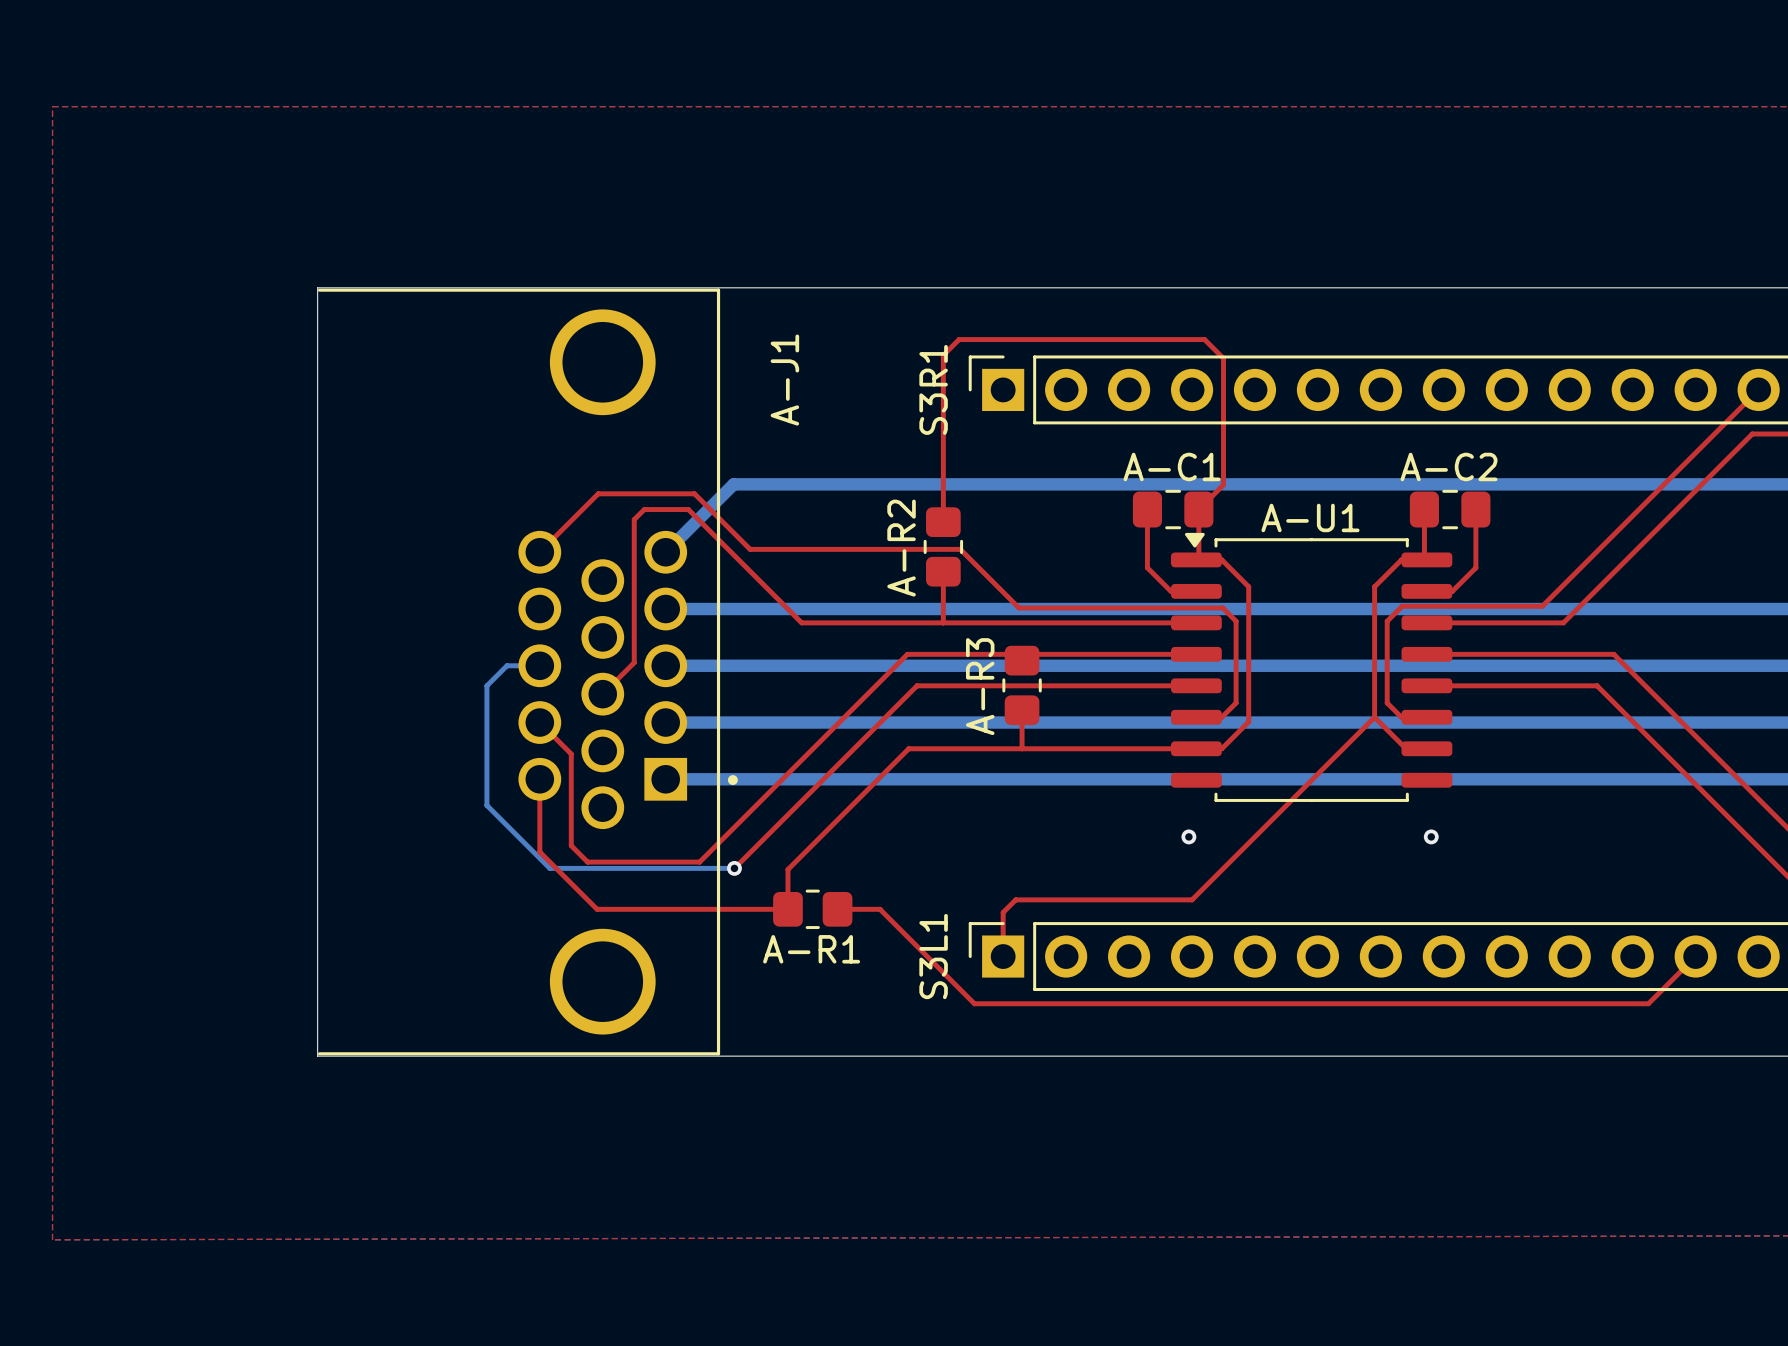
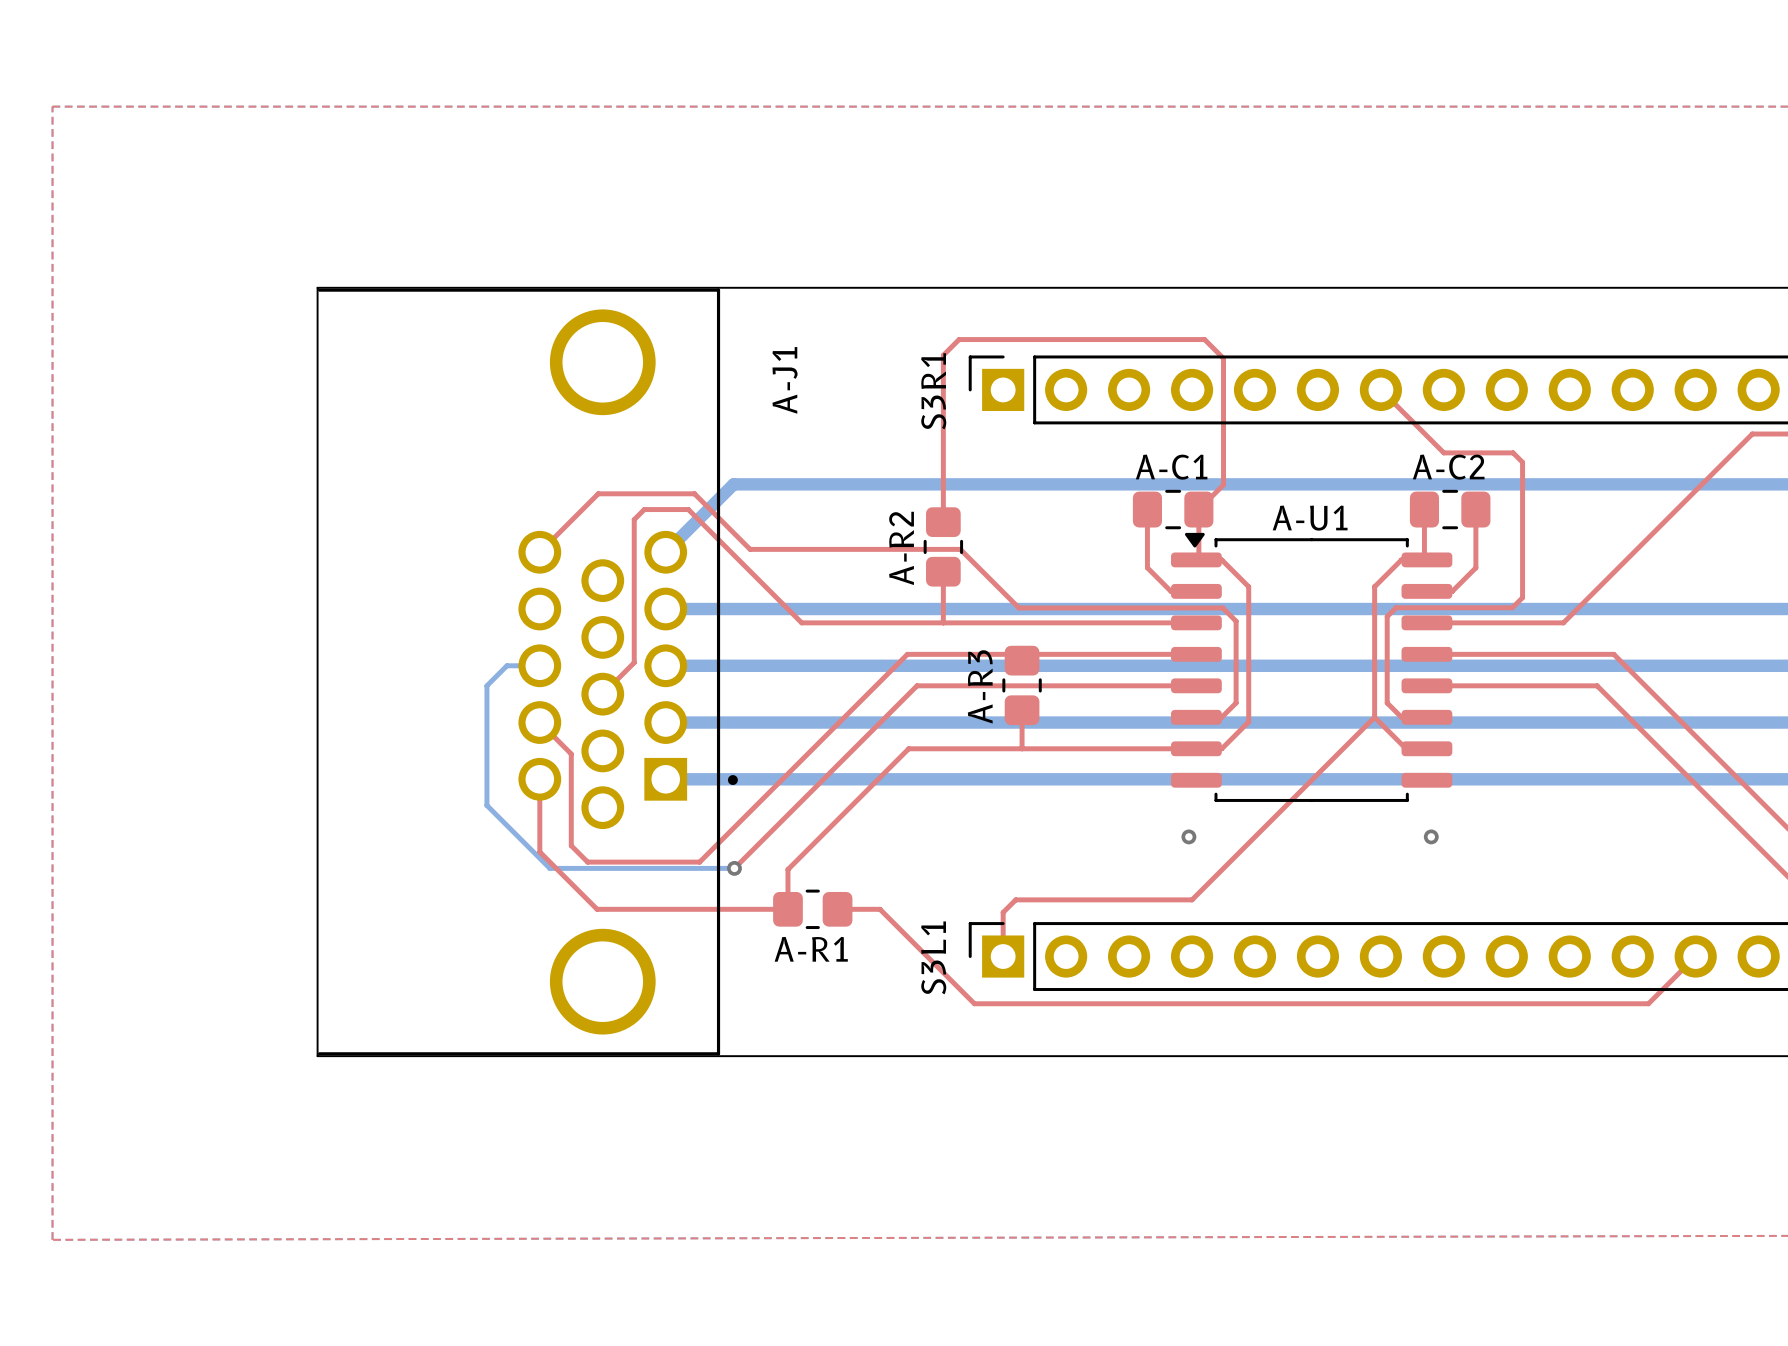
top track: (1758, 389) (1542, 606) (1402, 606) (1387, 621) -> (1380, 389) (1443, 452) (1513, 452) (1522, 462) (1522, 597) (1512, 607) (1396, 607) (1387, 616) (1387, 621)

